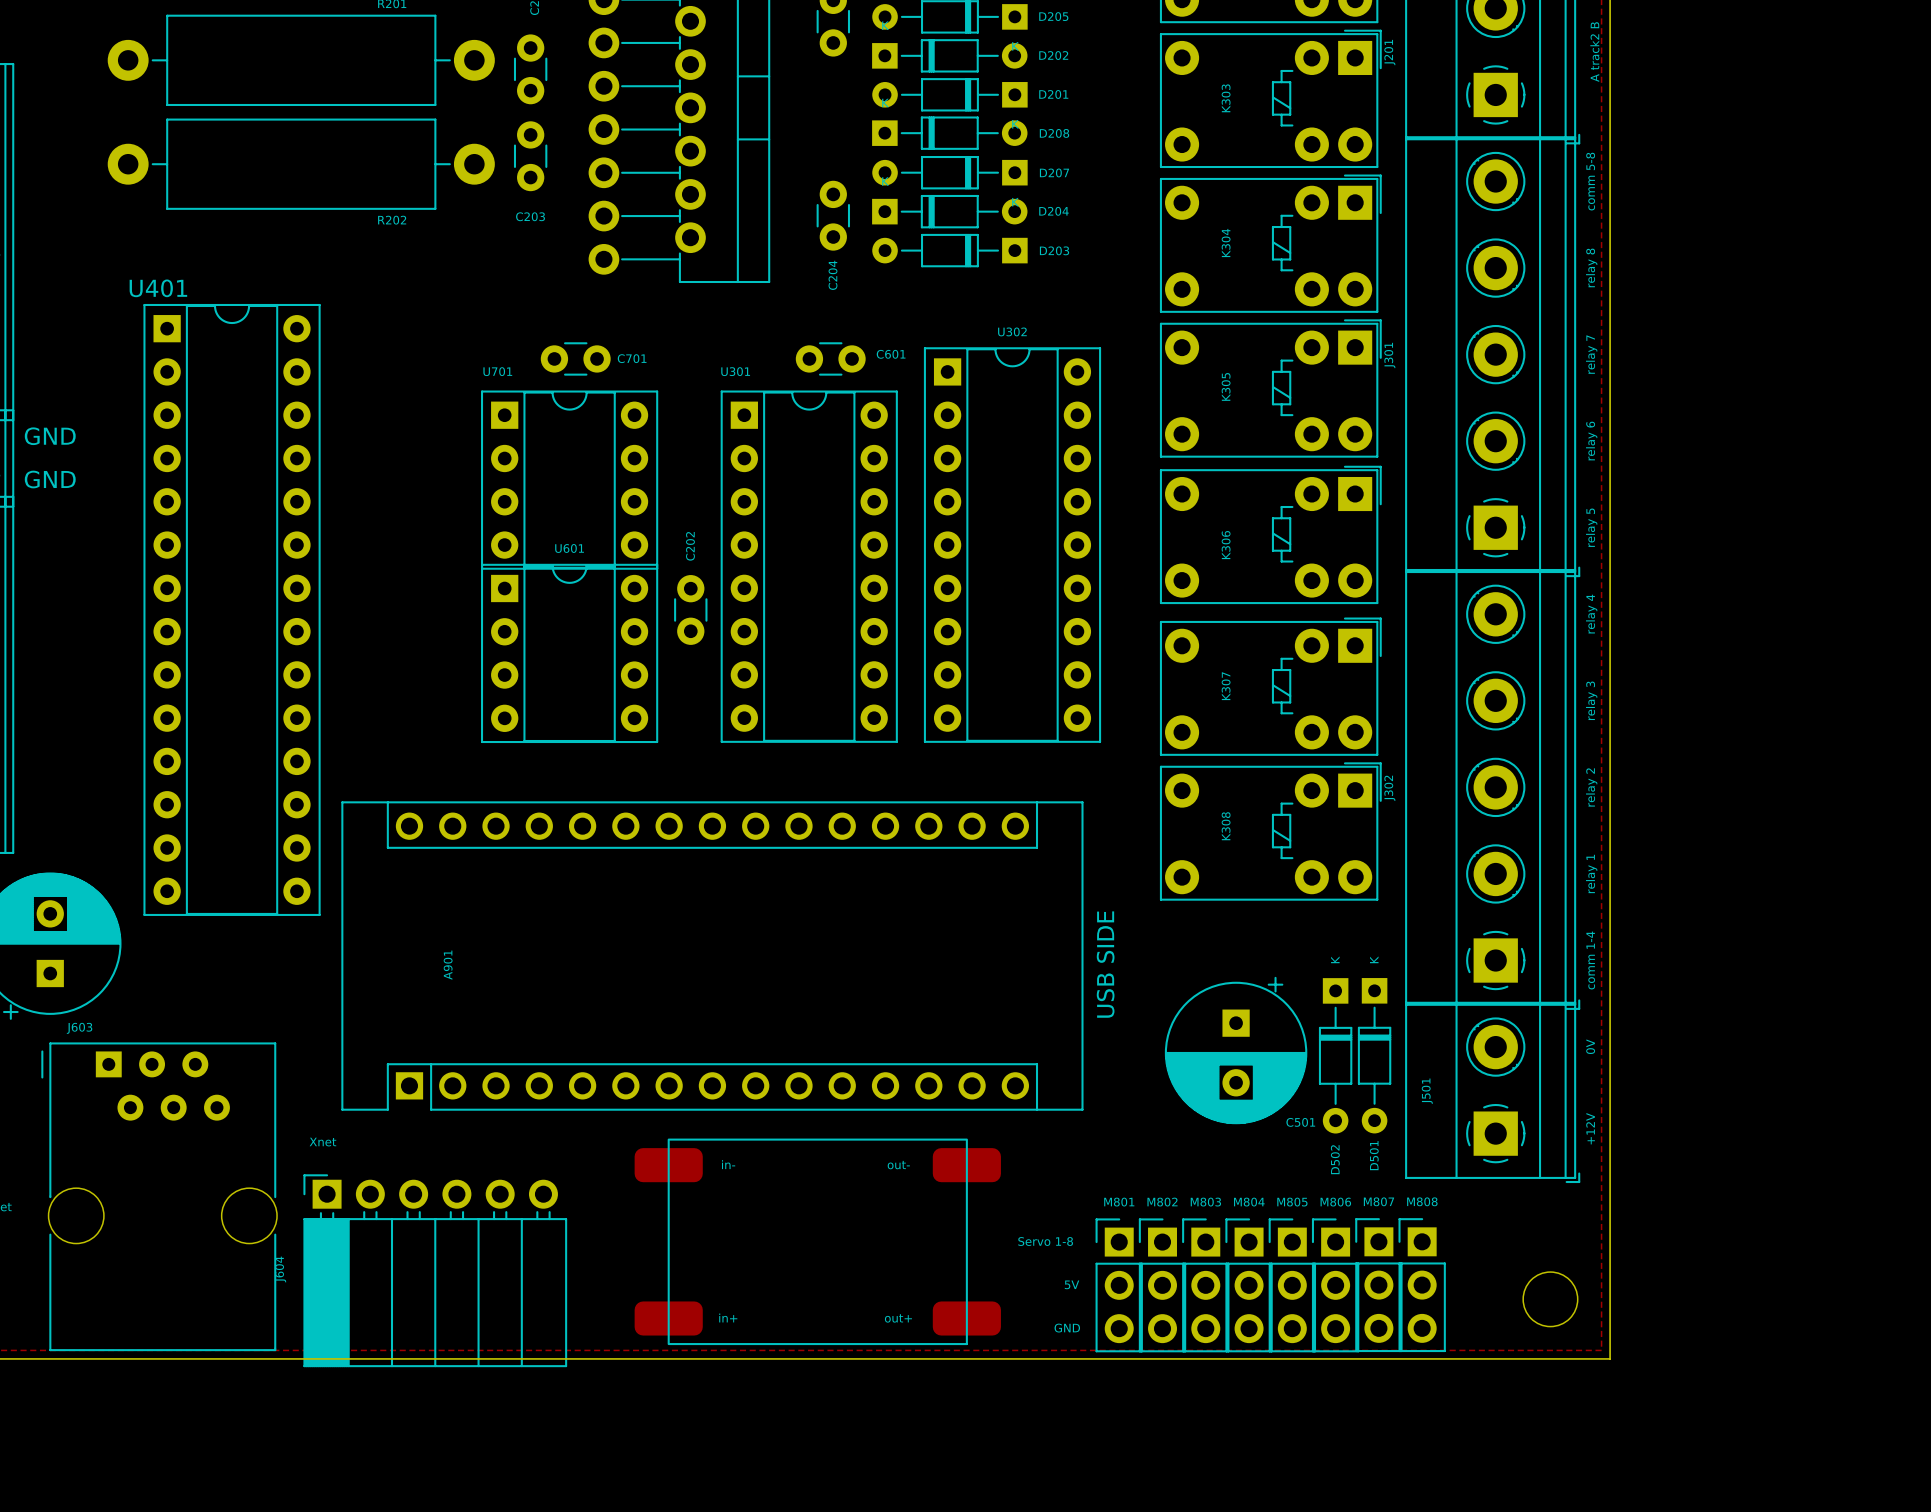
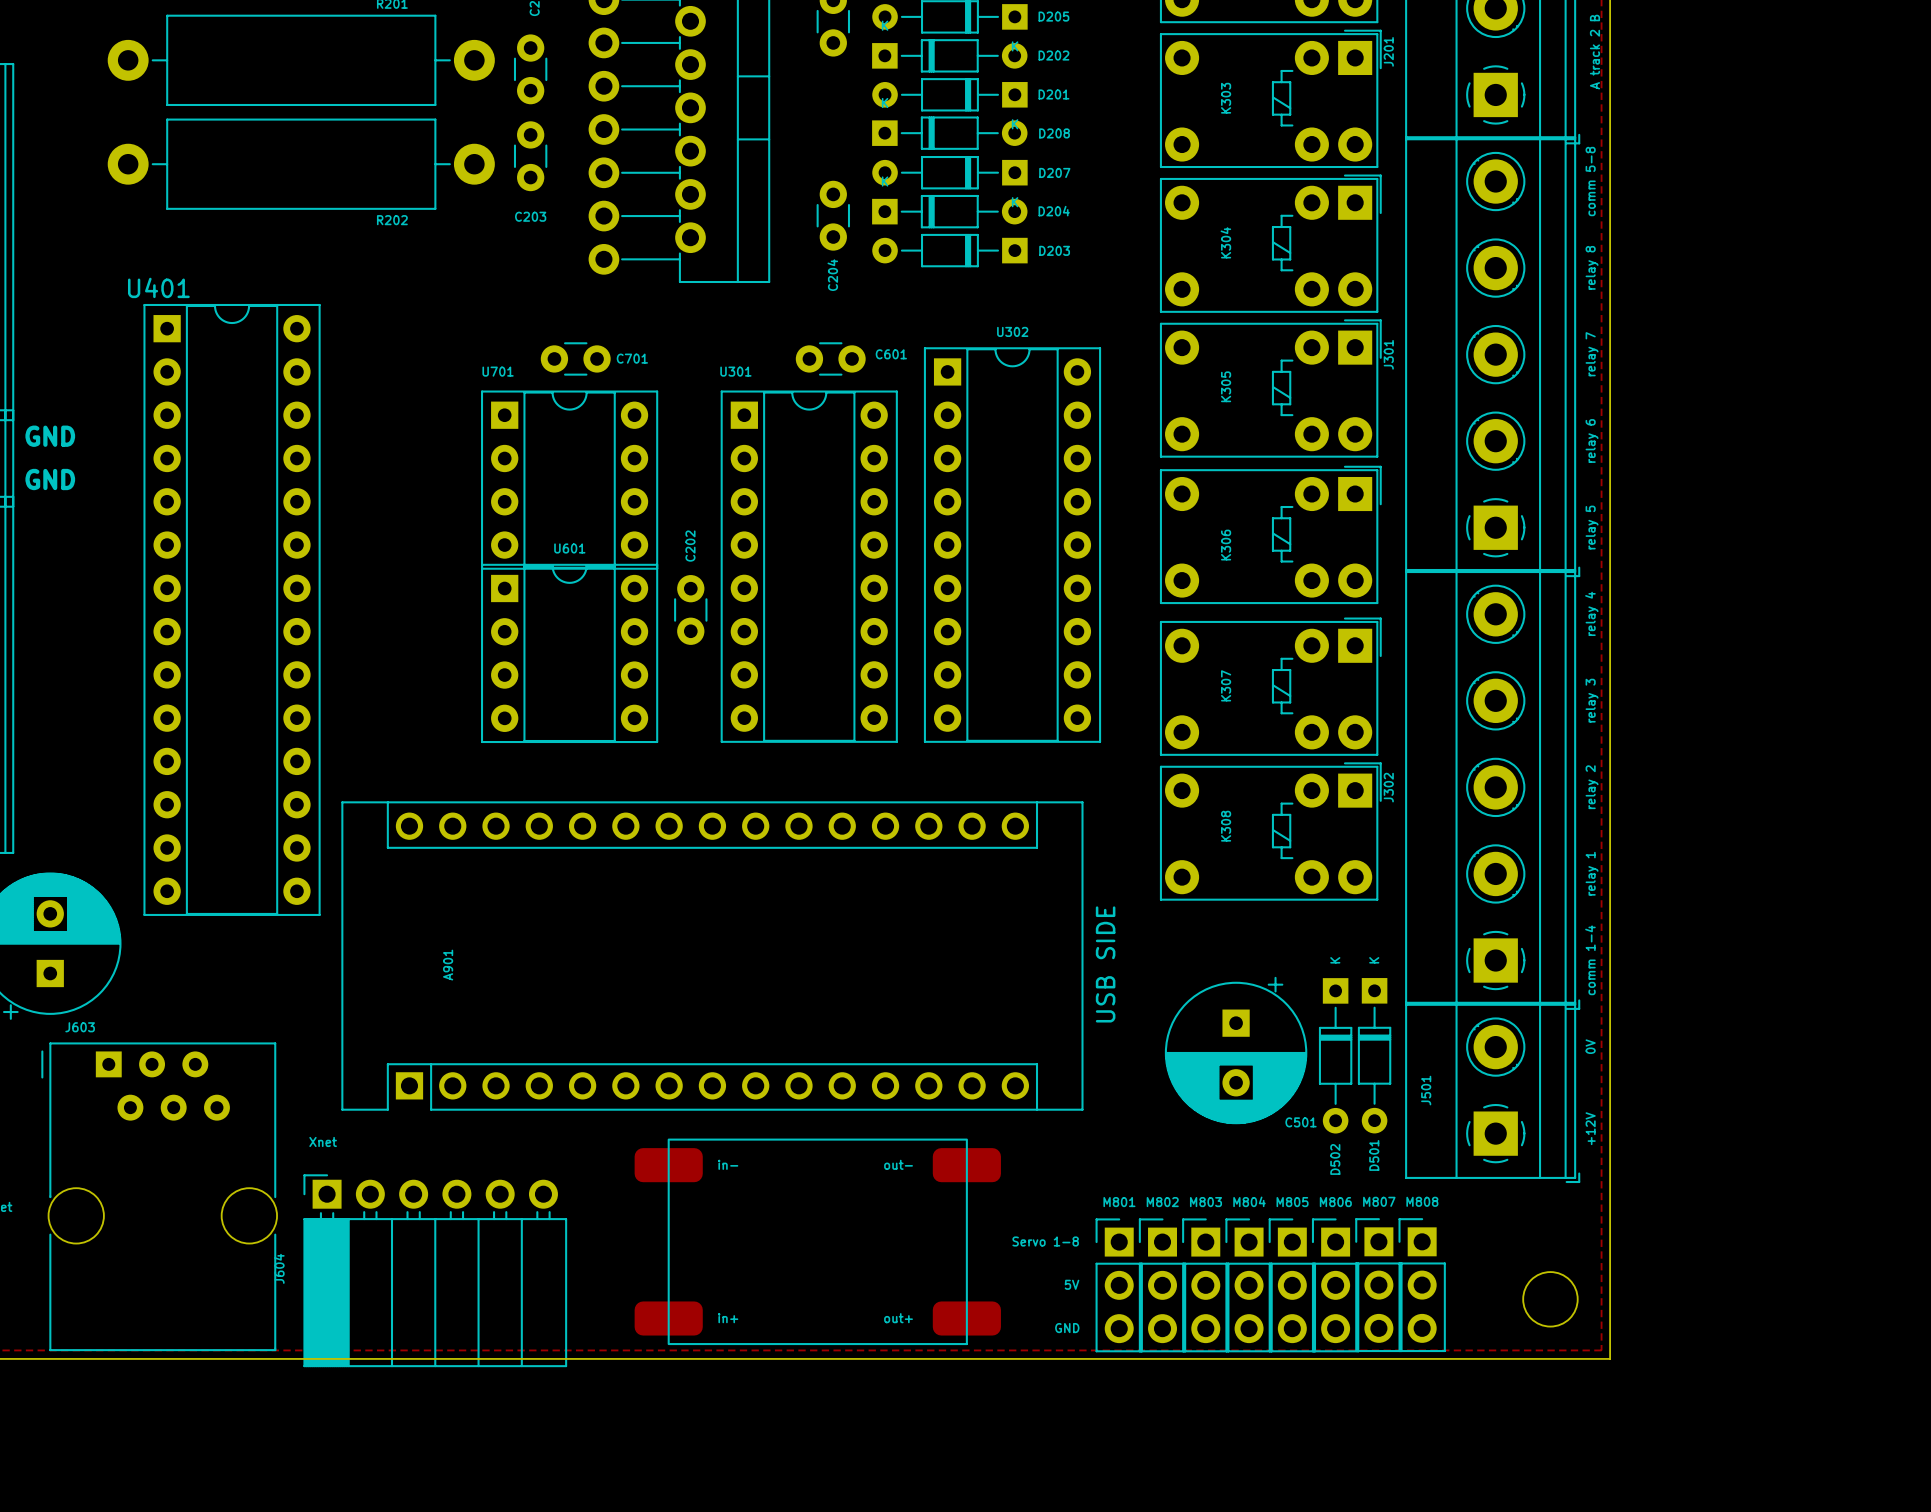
text: A track2 B (1594, 52) -> A track 2 B (1594, 52)

